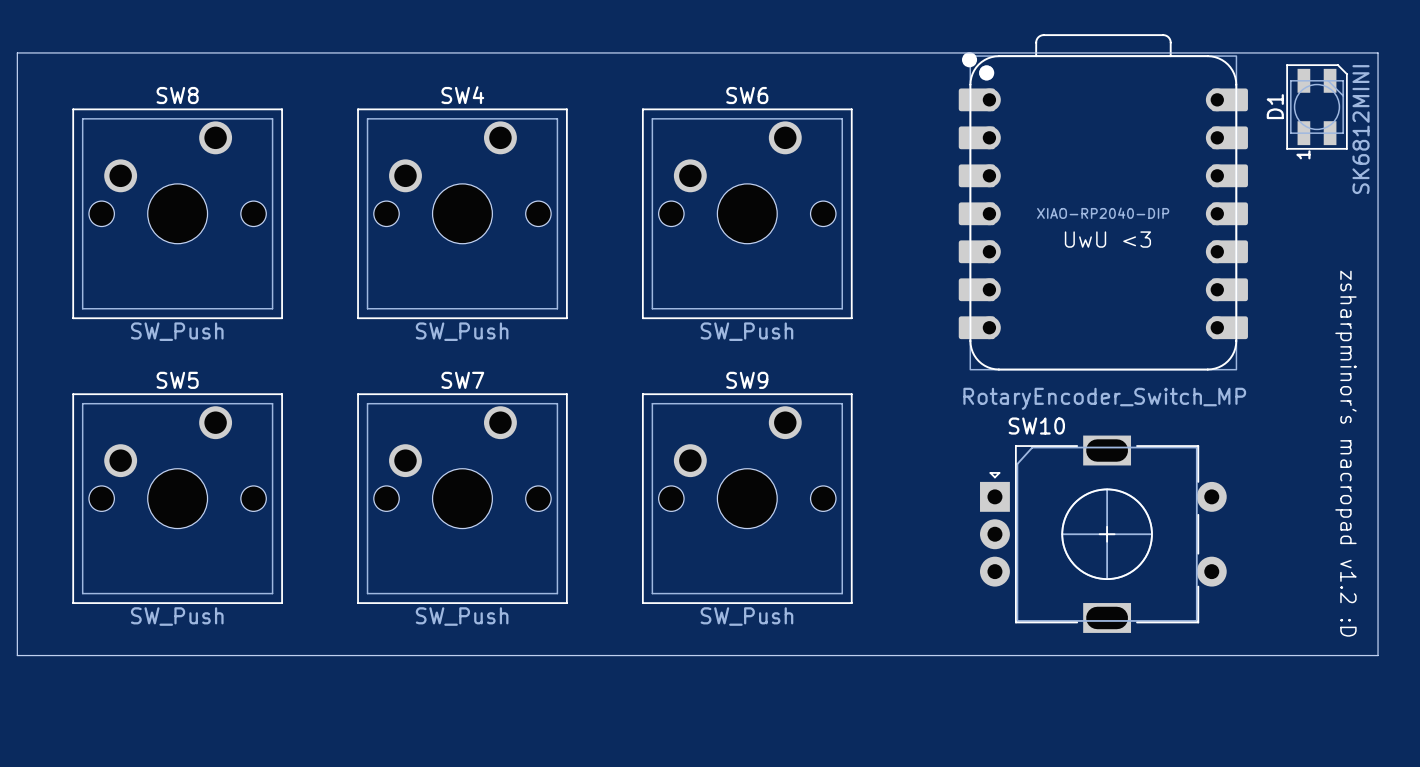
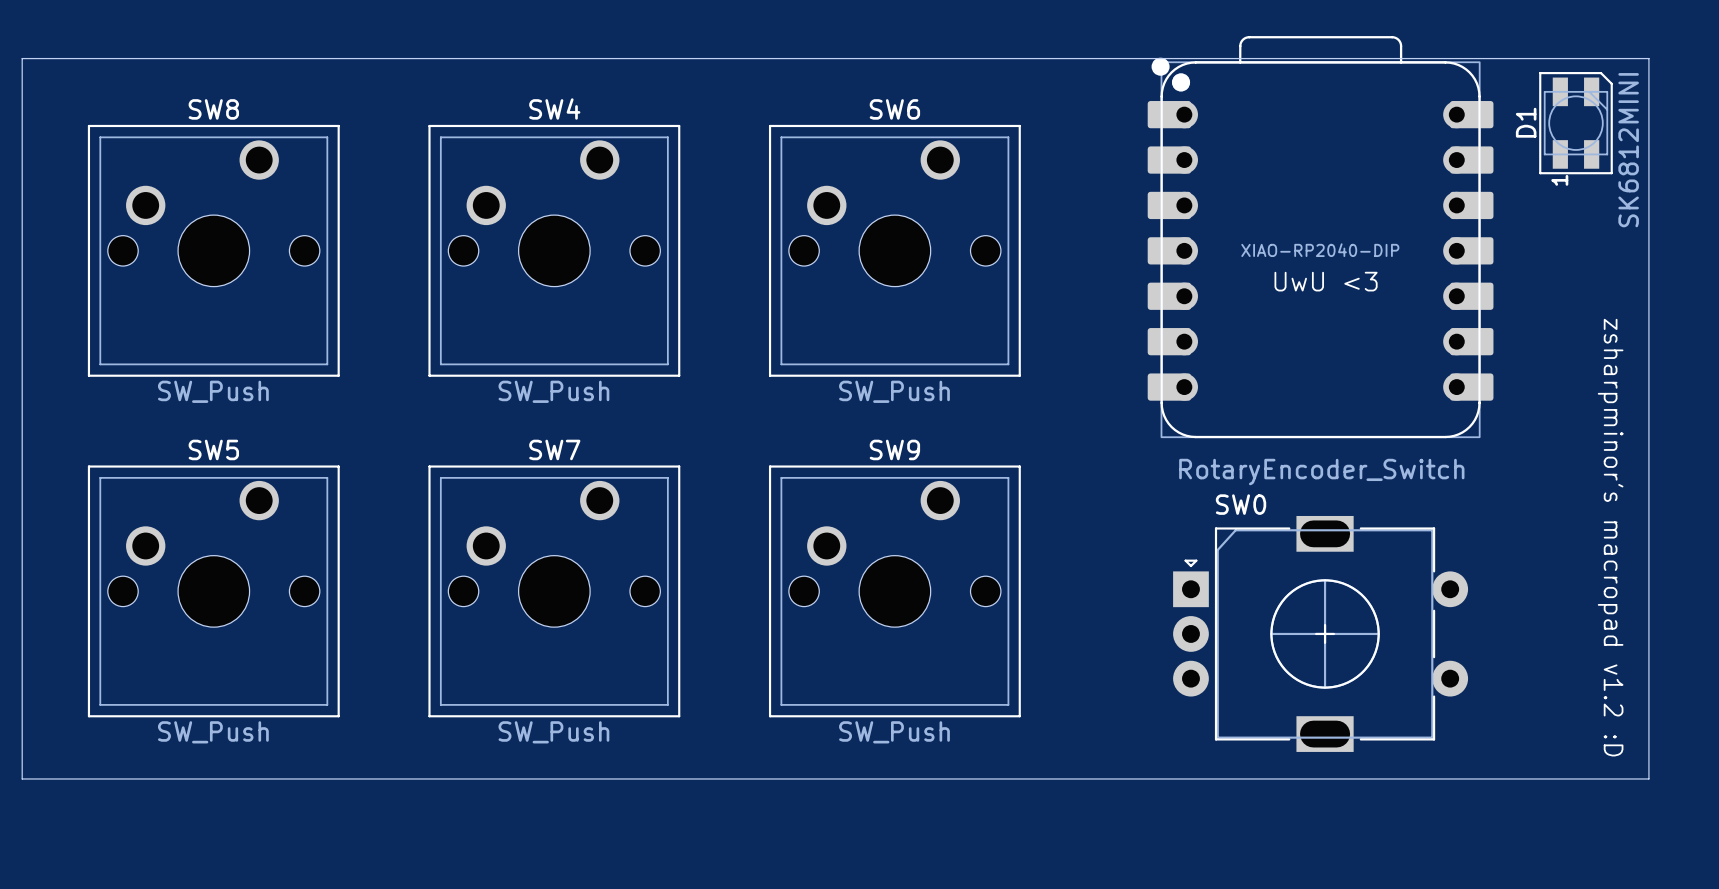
SW10 value: RotaryEncoder_Switch_MP (1104, 398) -> RotaryEncoder_Switch (1321, 472)
SW10 name: SW10 (1036, 426) -> SW0 (1241, 504)

